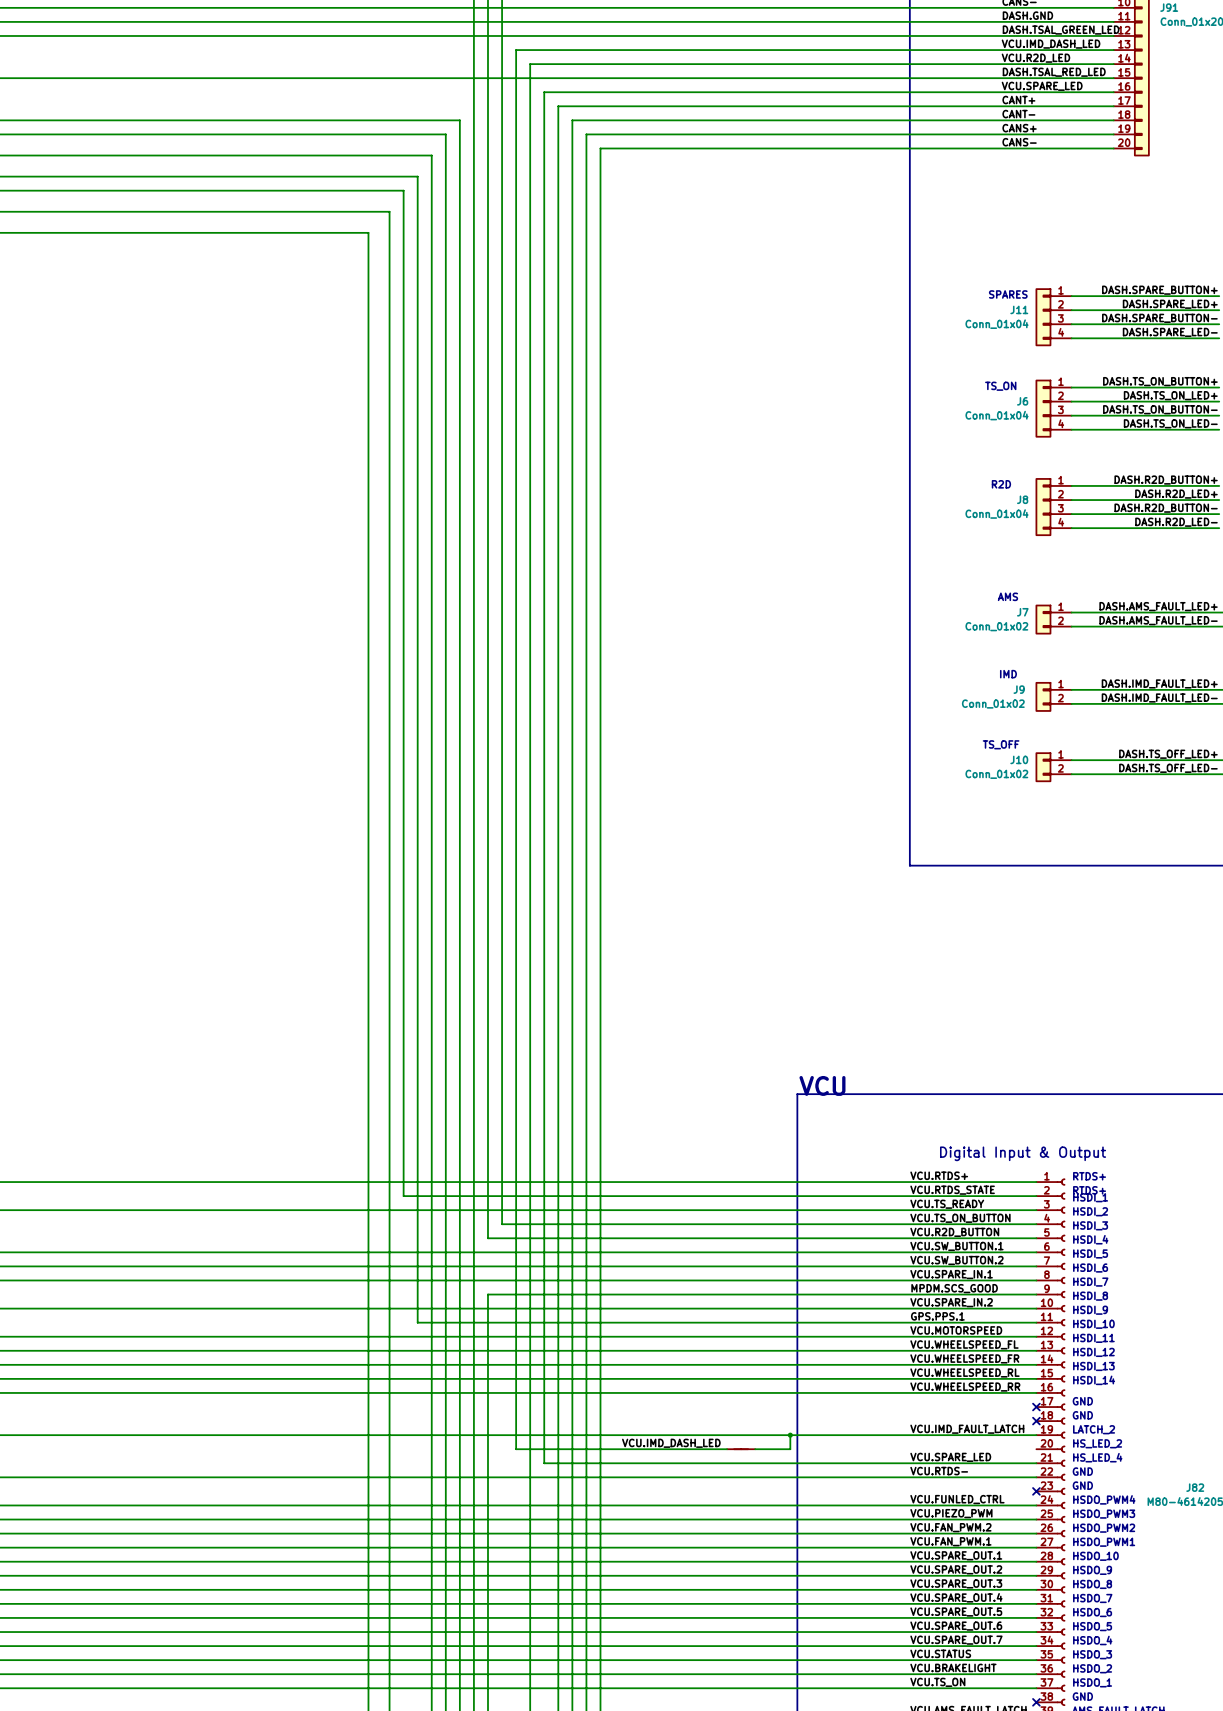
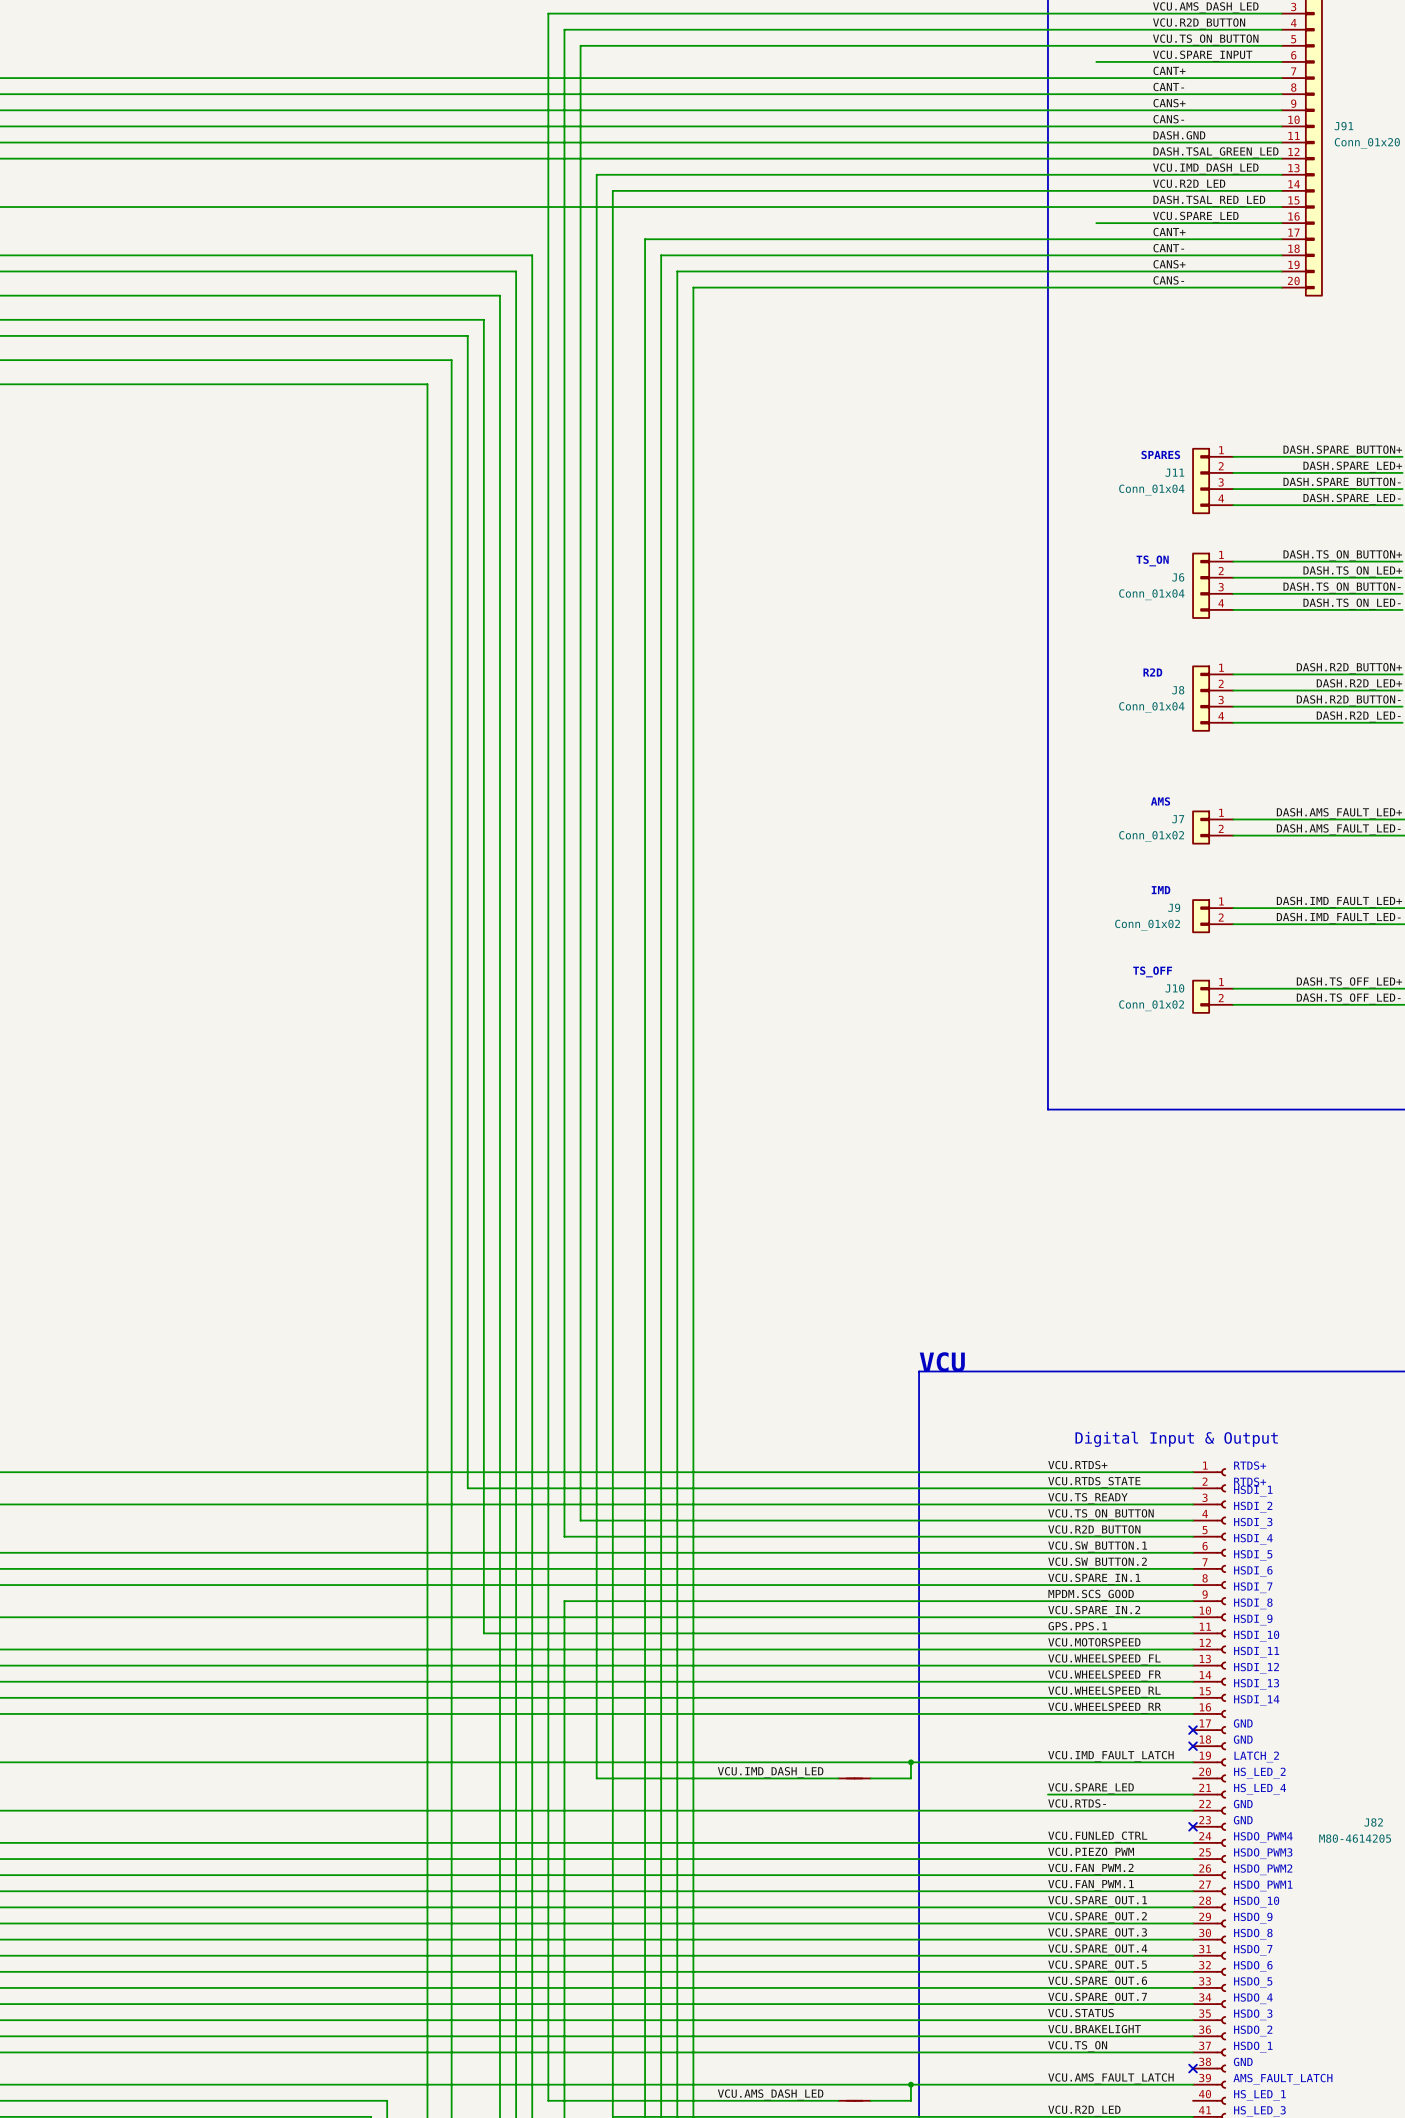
wire: (952, 92) (544, 92) (544, 1463) (909, 1463) -> none

